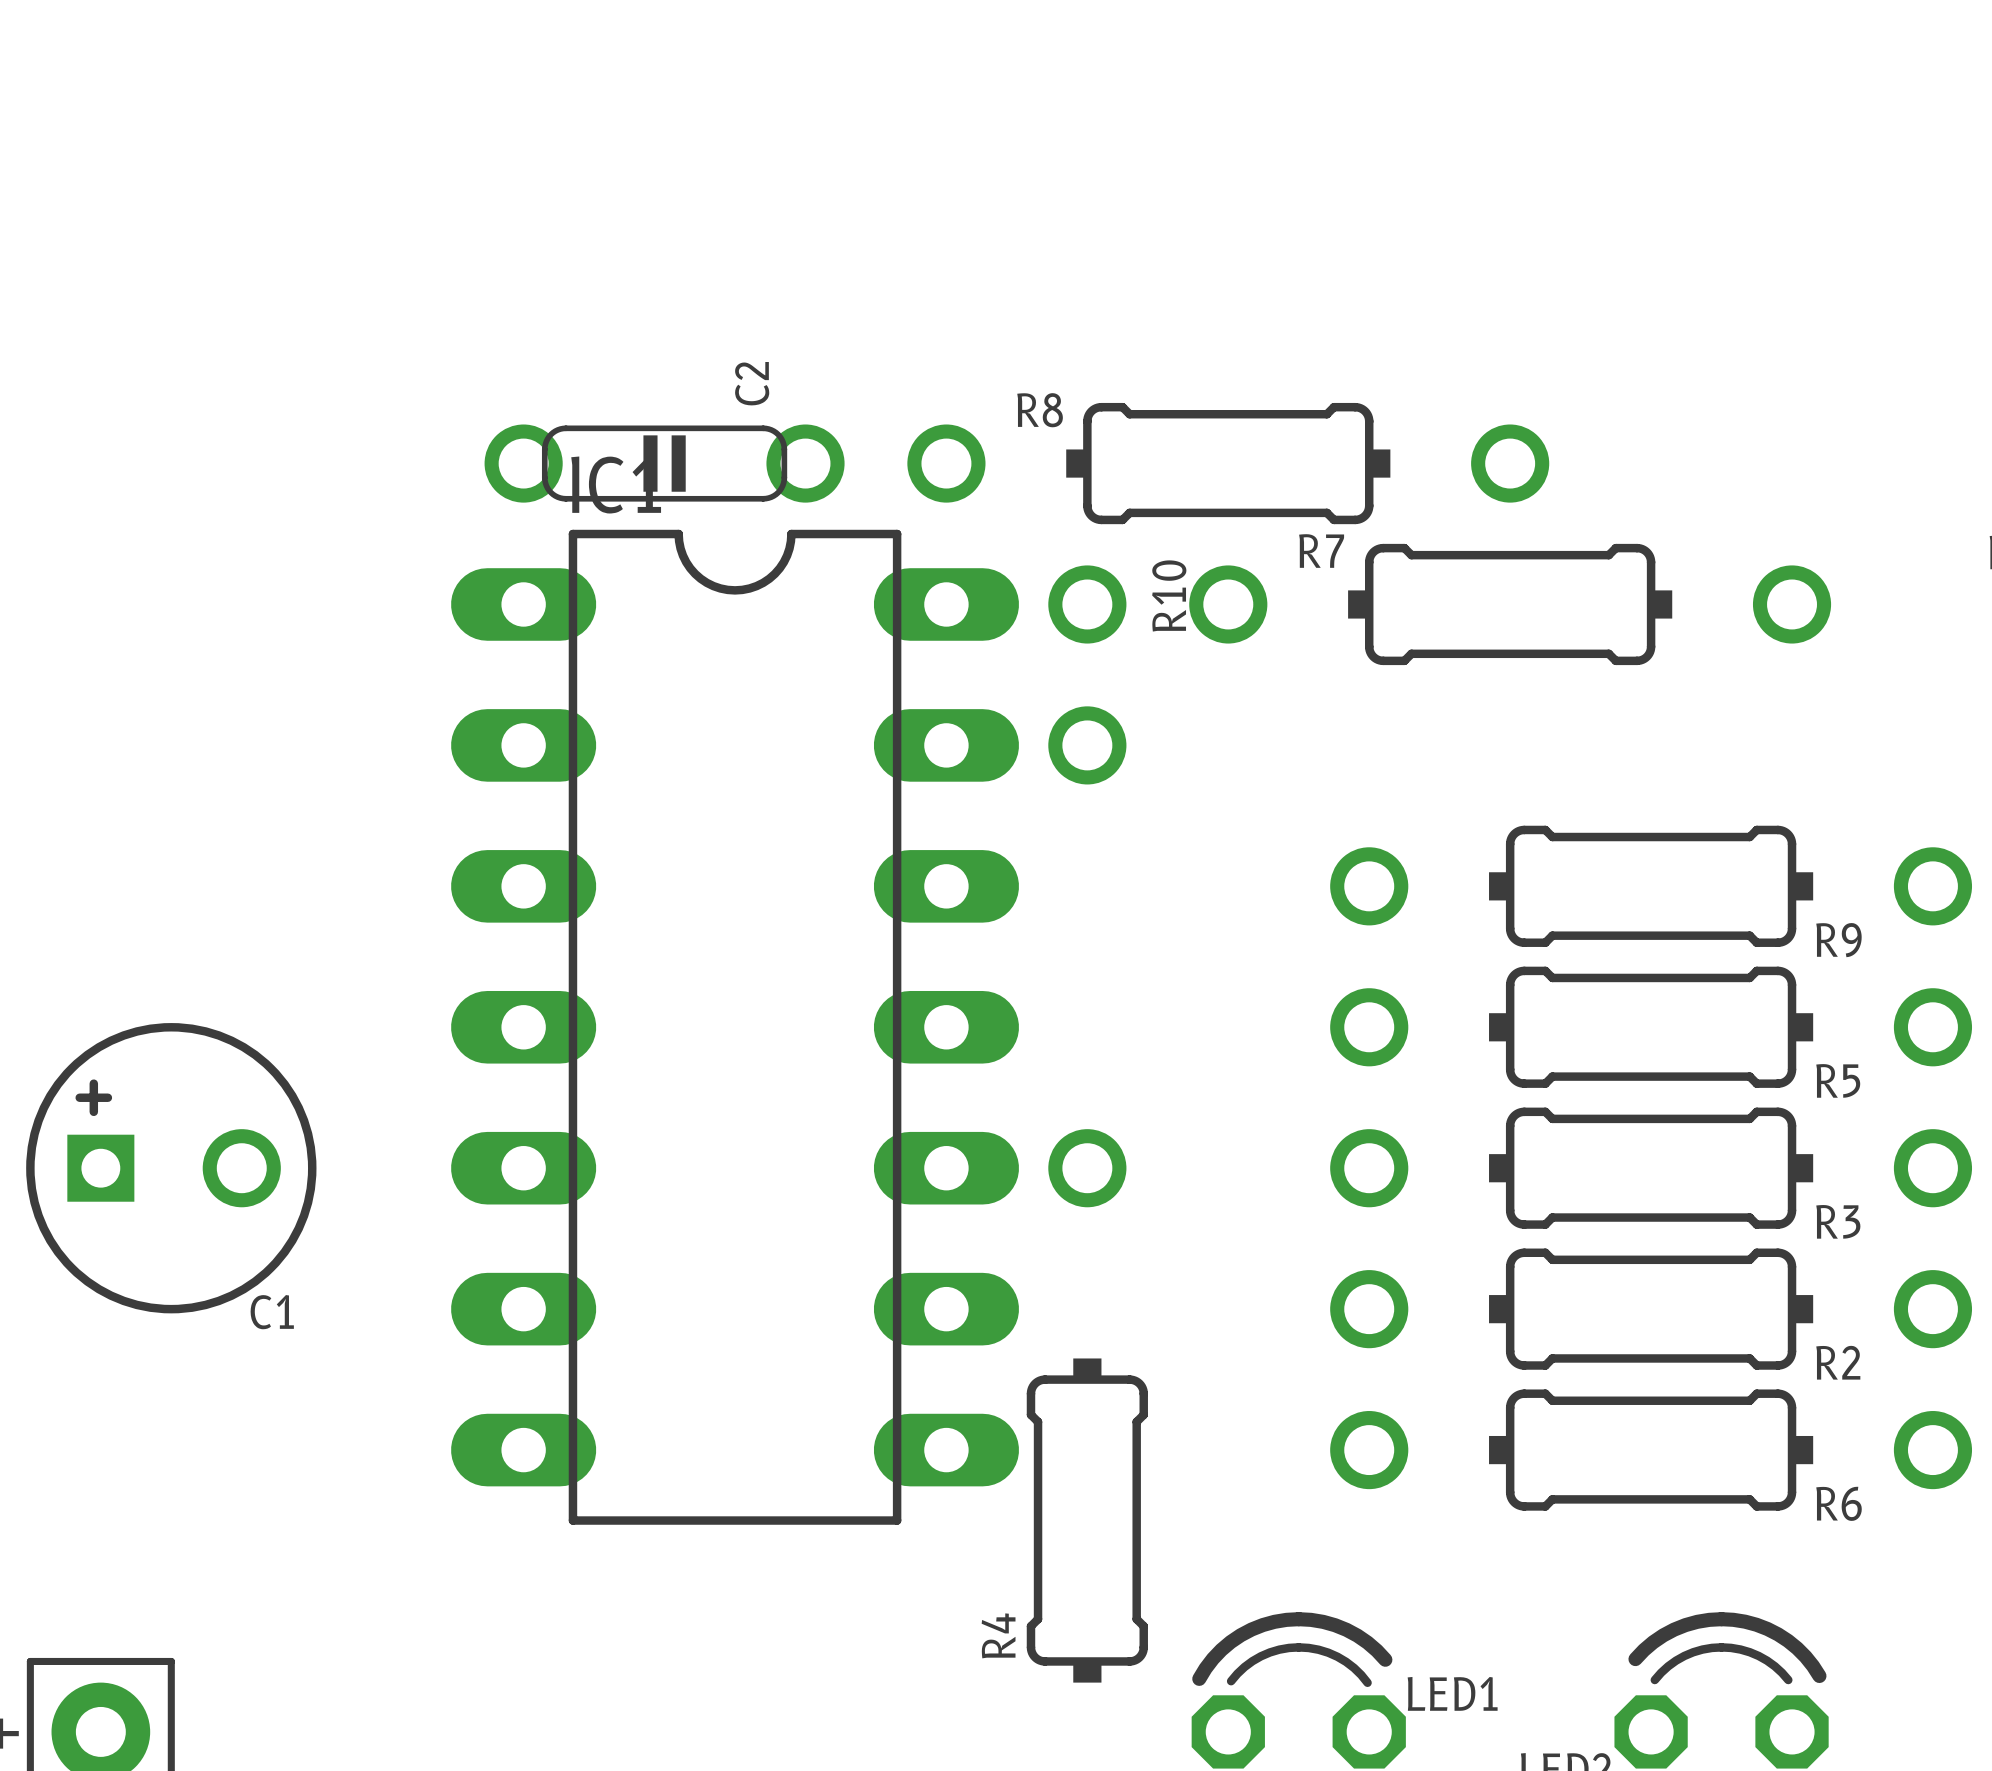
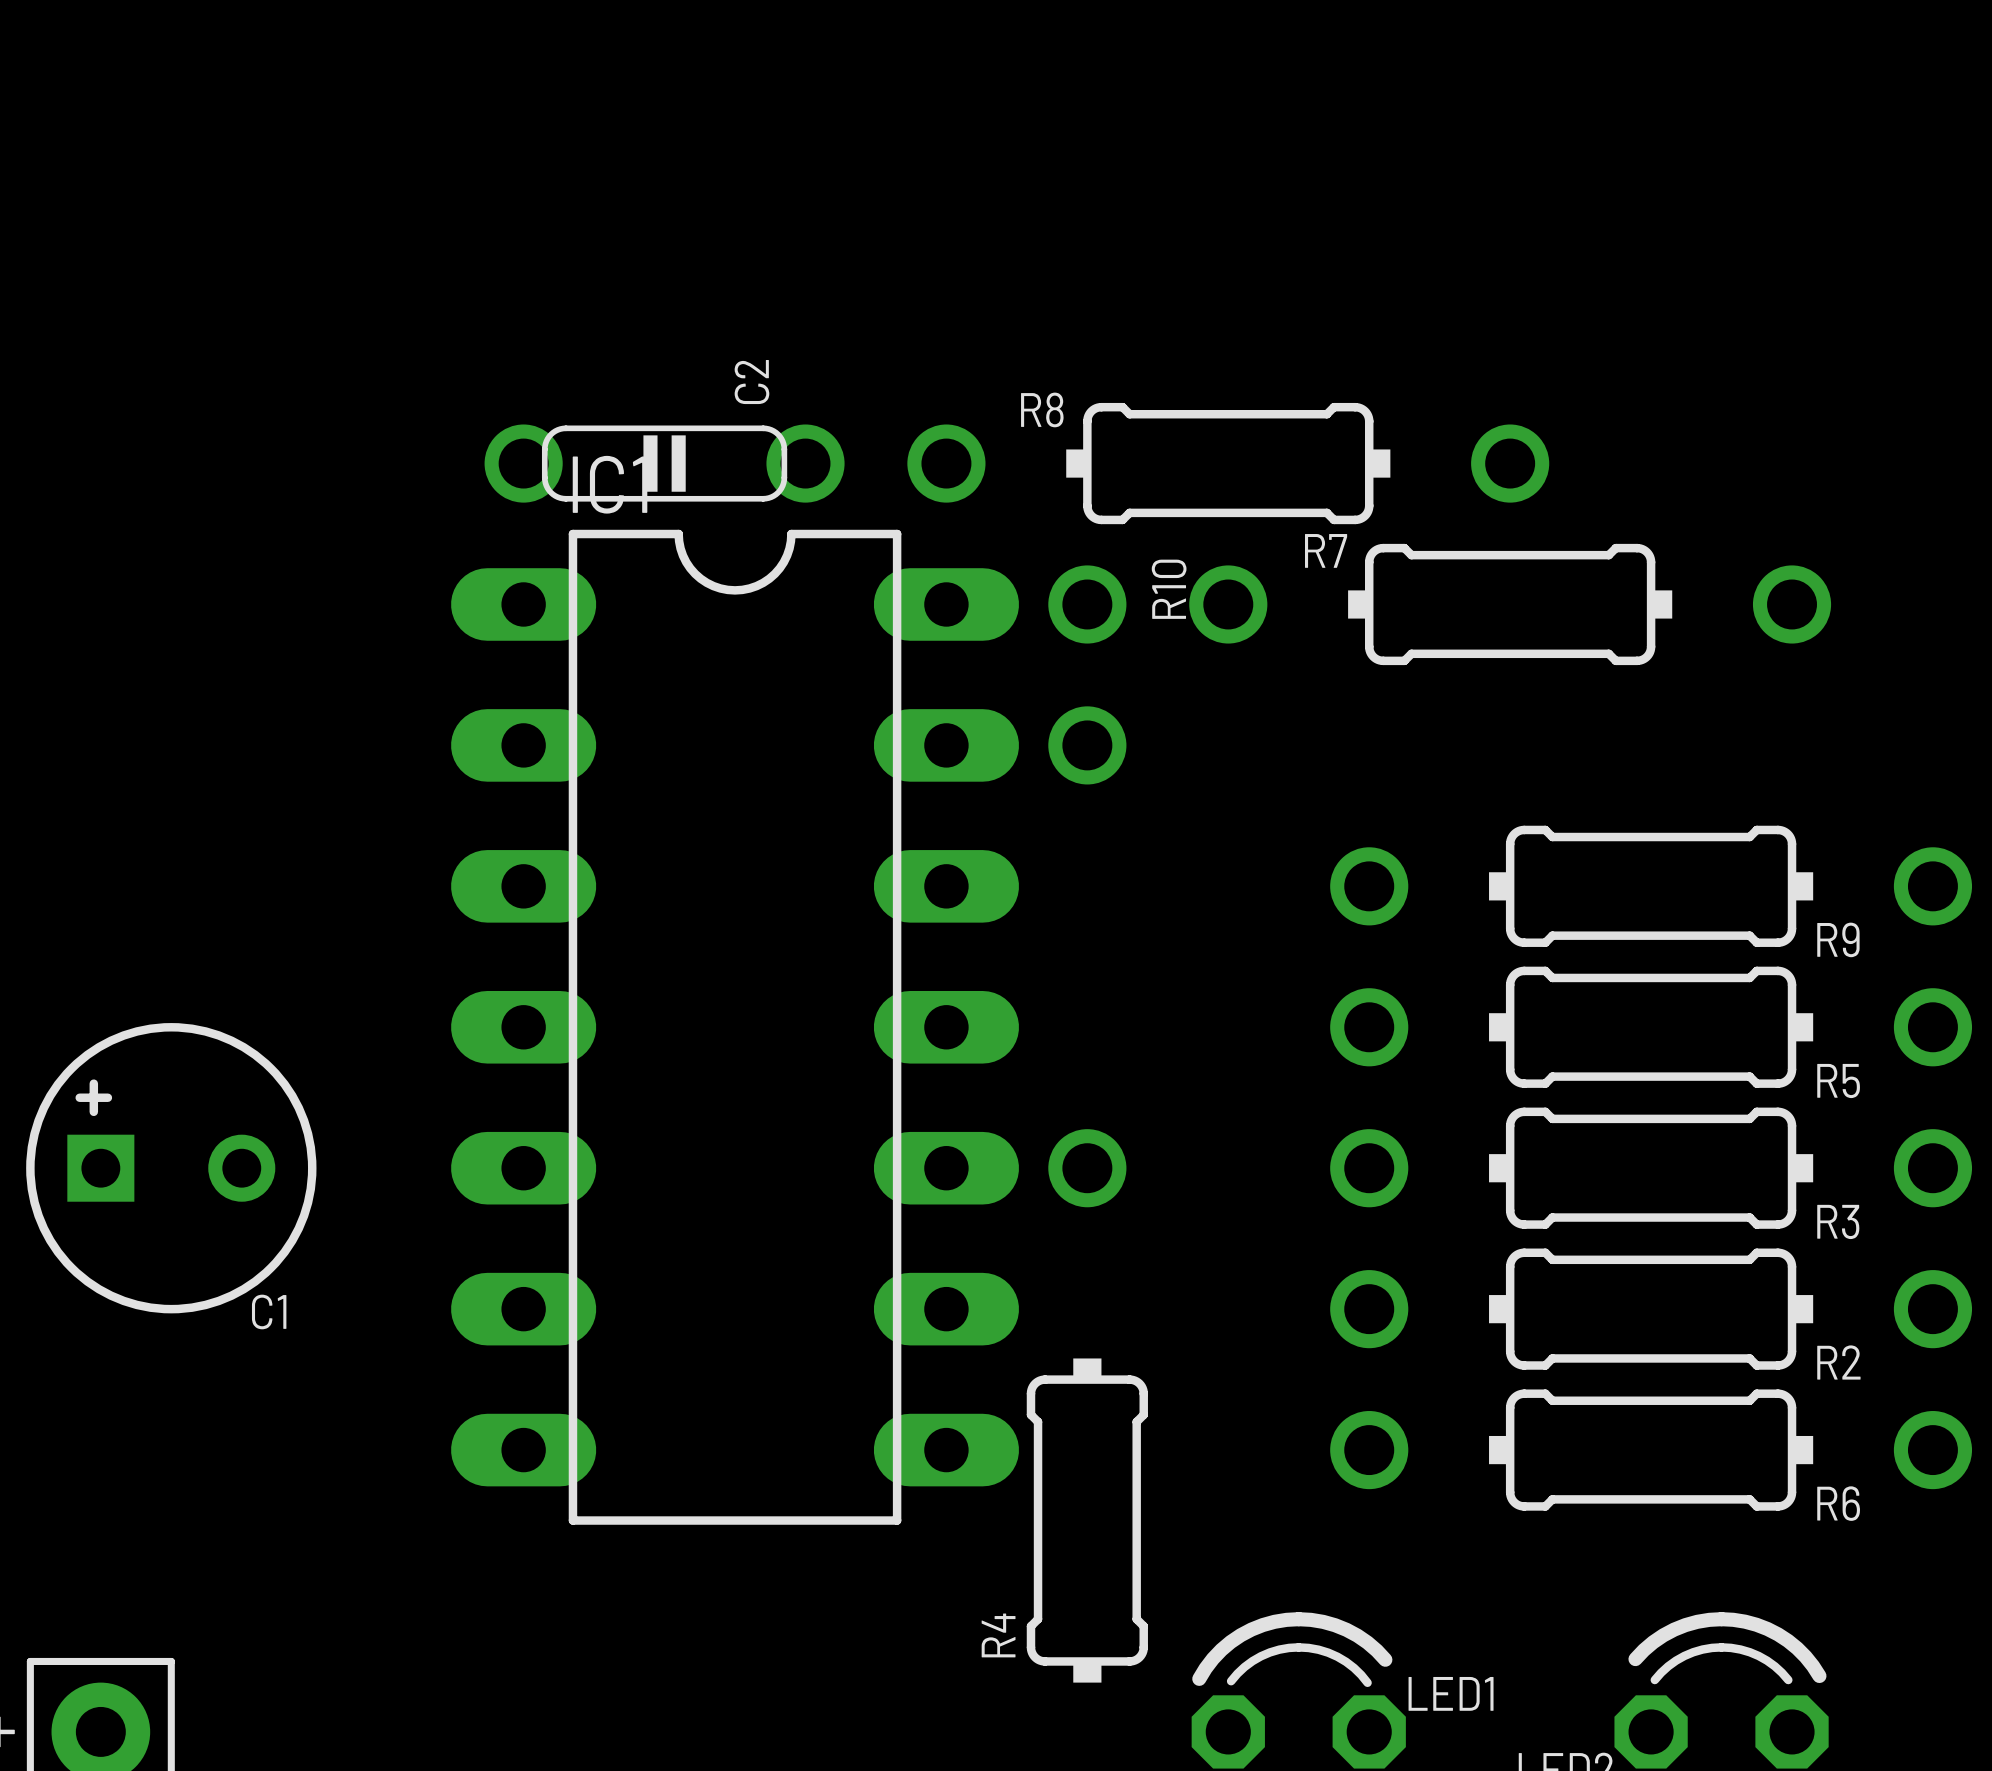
C1 footprint: [26, 1023, 317, 1314] -> [26, 1023, 317, 1314]

